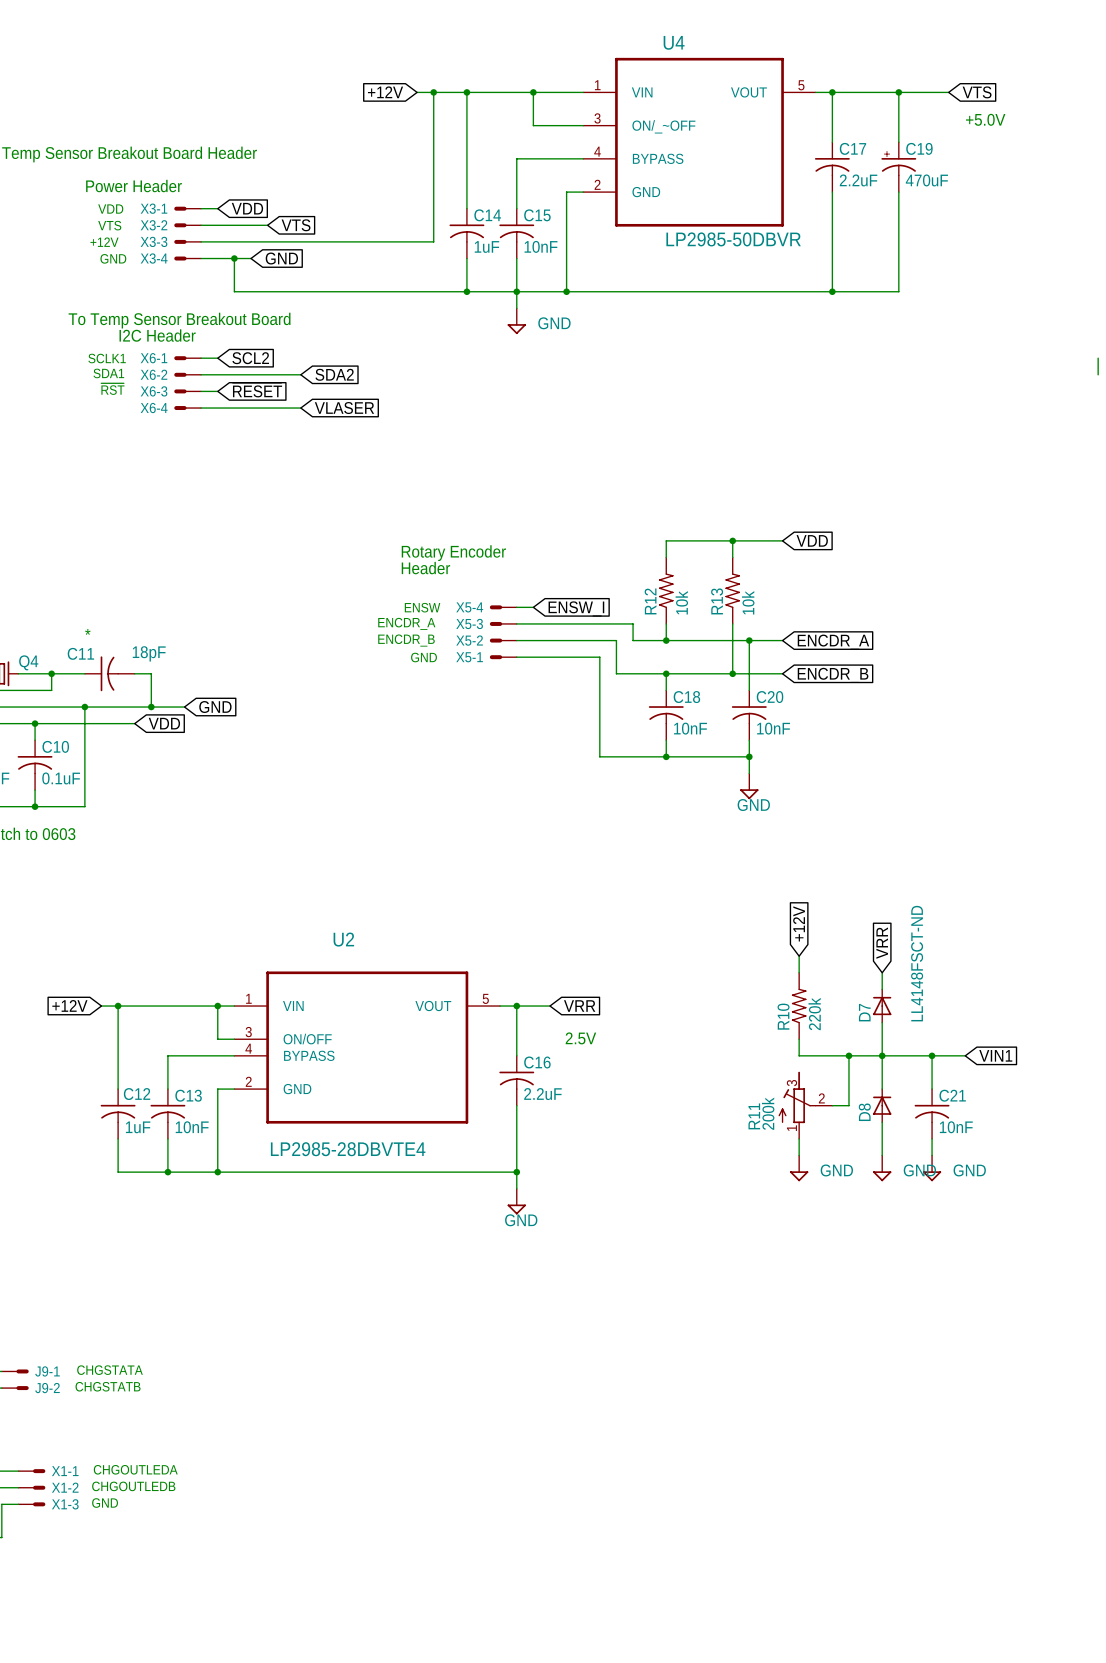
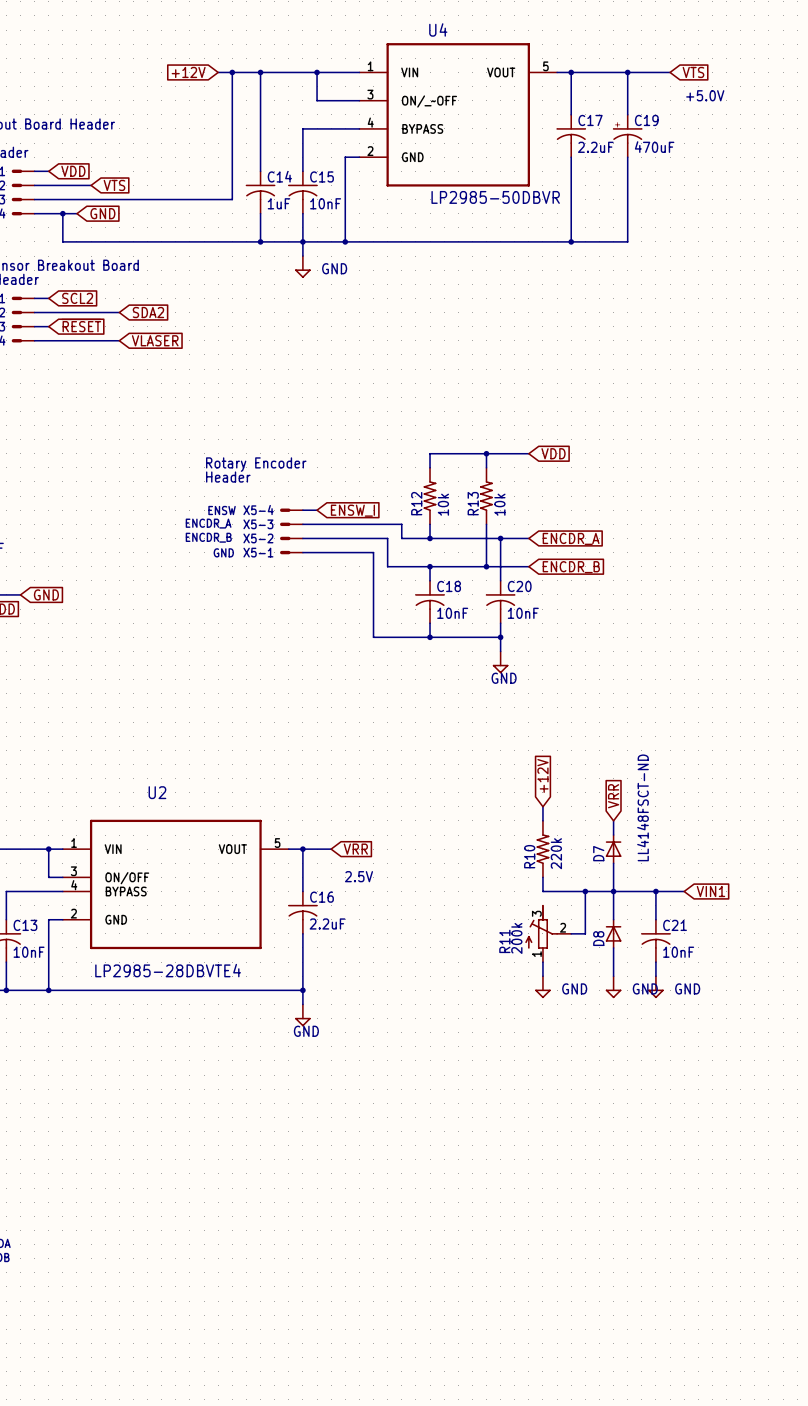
wire: (1098, 358) (1098, 374) -> none

